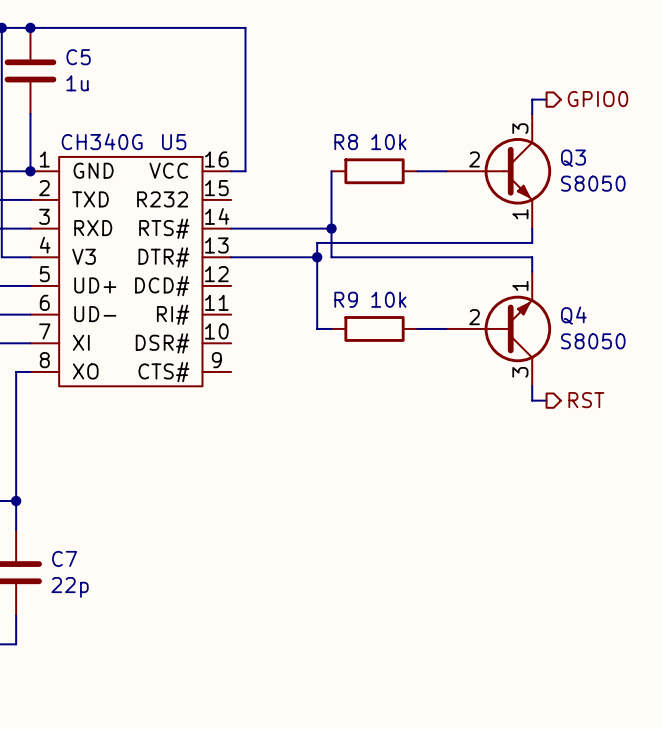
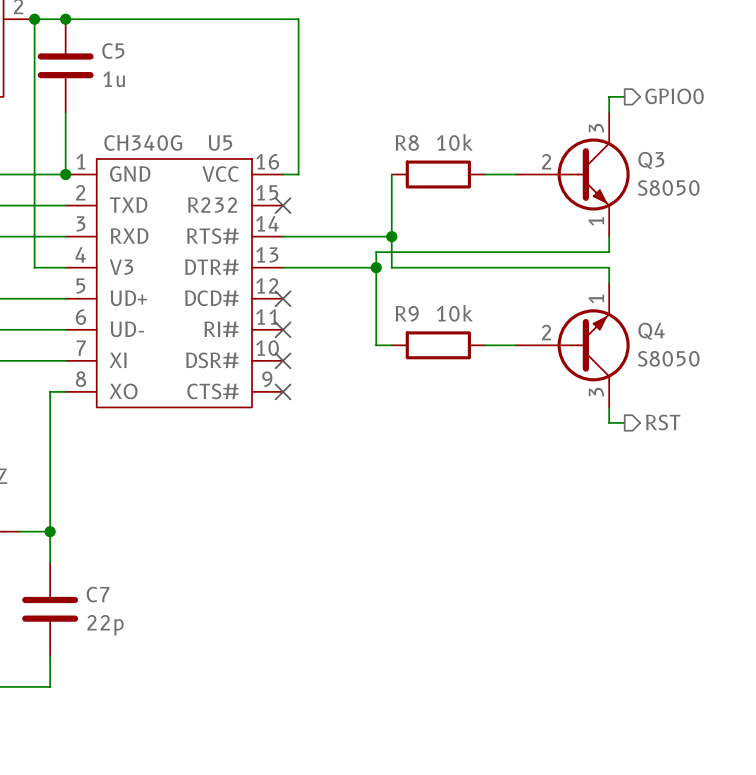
no-connect mark: none -> (283, 205)
no-connect mark: none -> (283, 298)
no-connect mark: none -> (283, 329)
no-connect mark: none -> (283, 360)
no-connect mark: none -> (283, 391)

